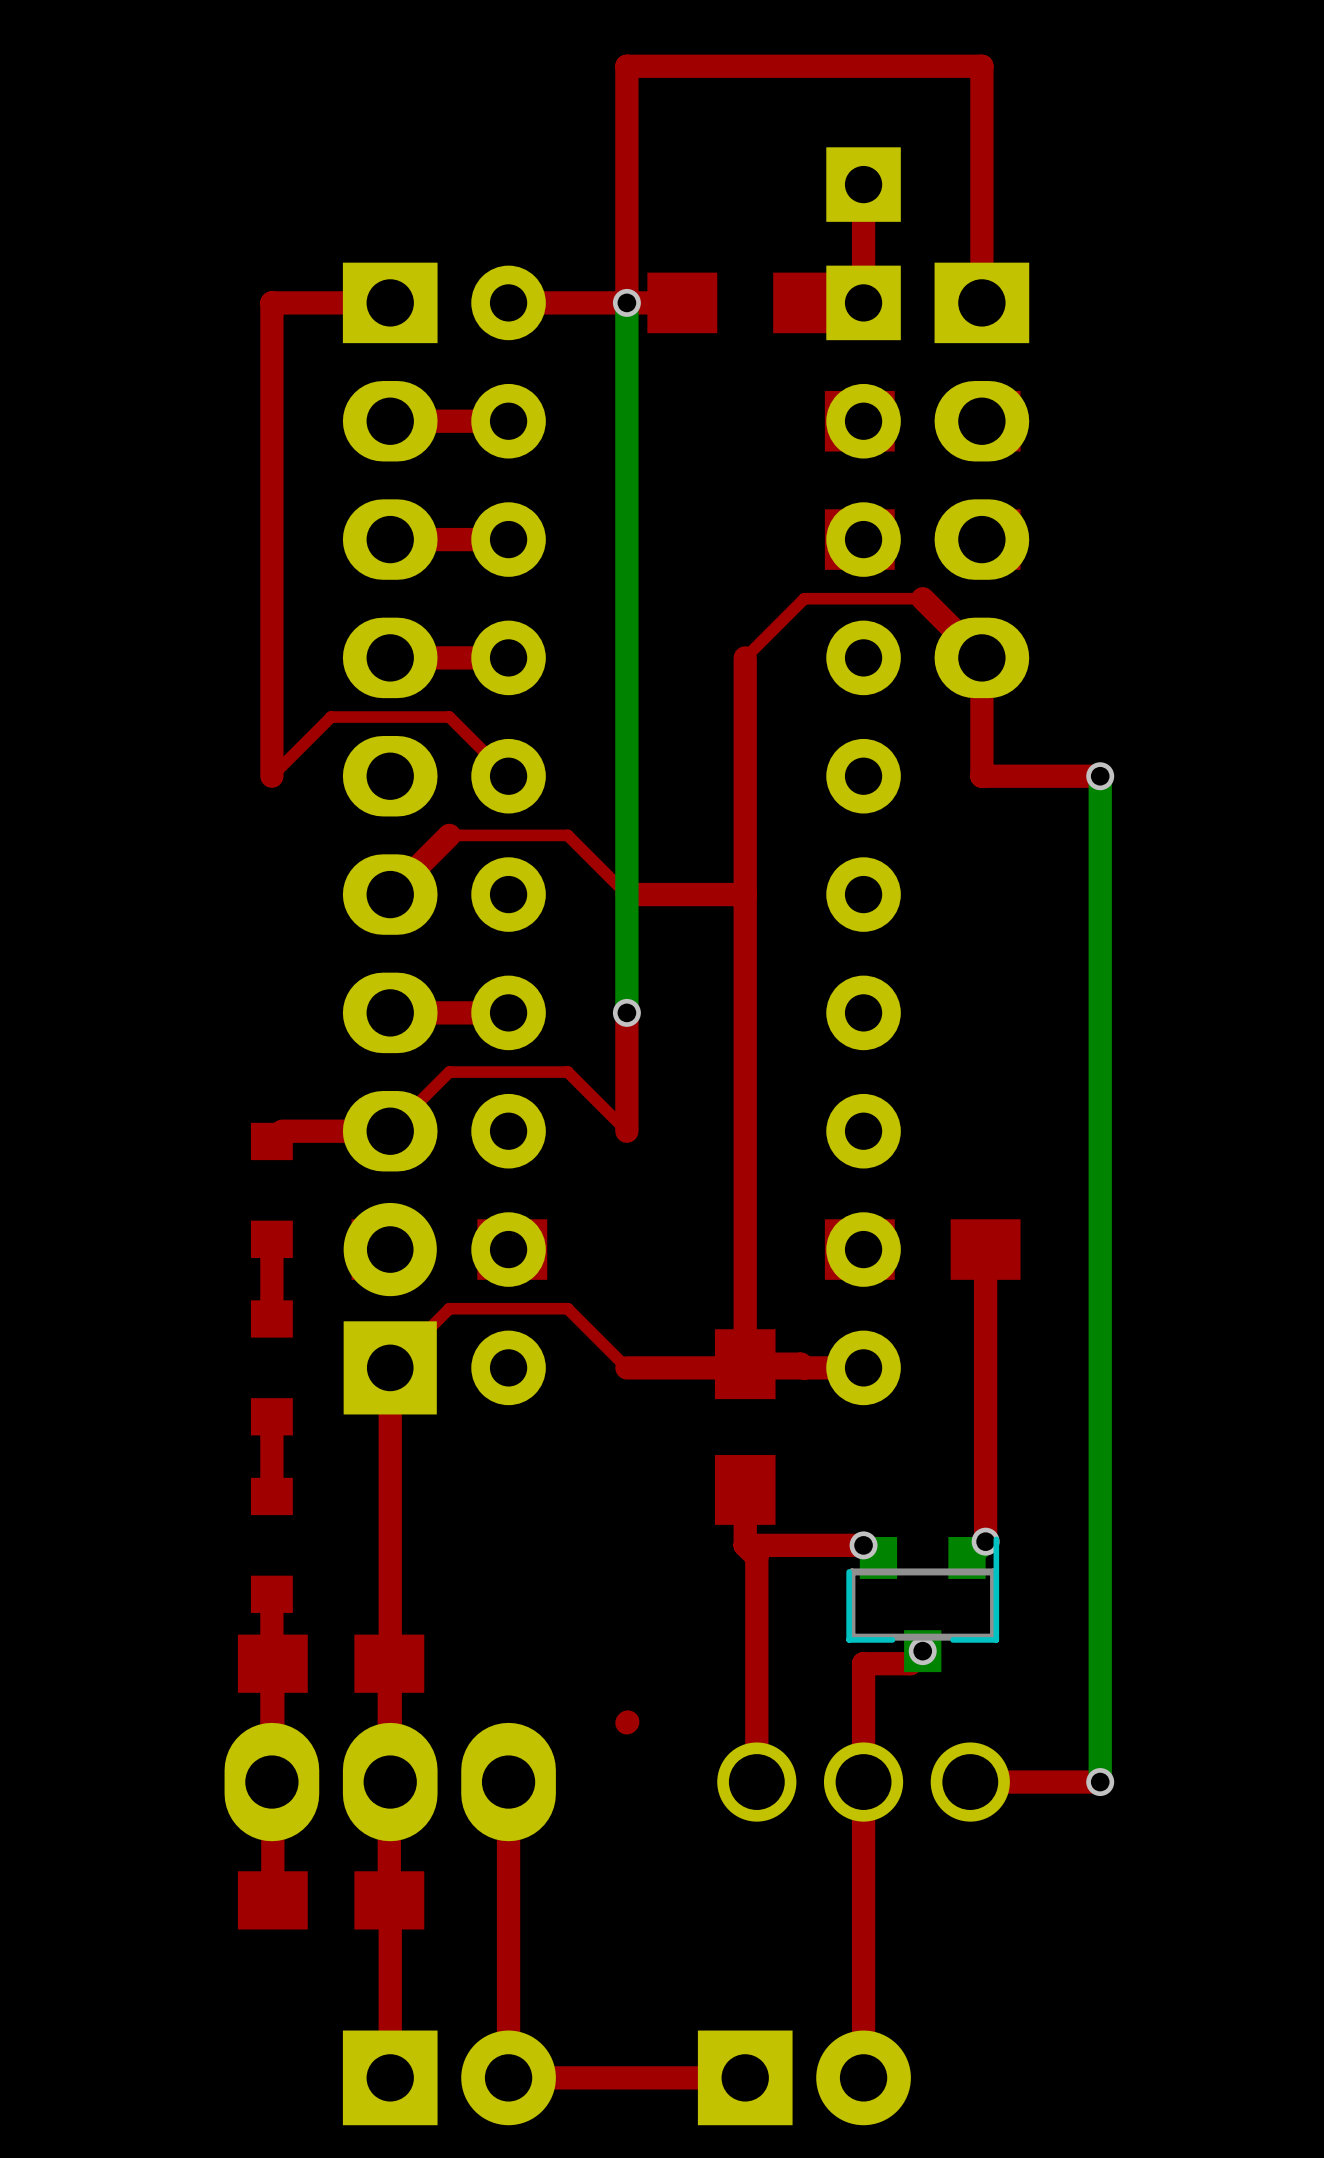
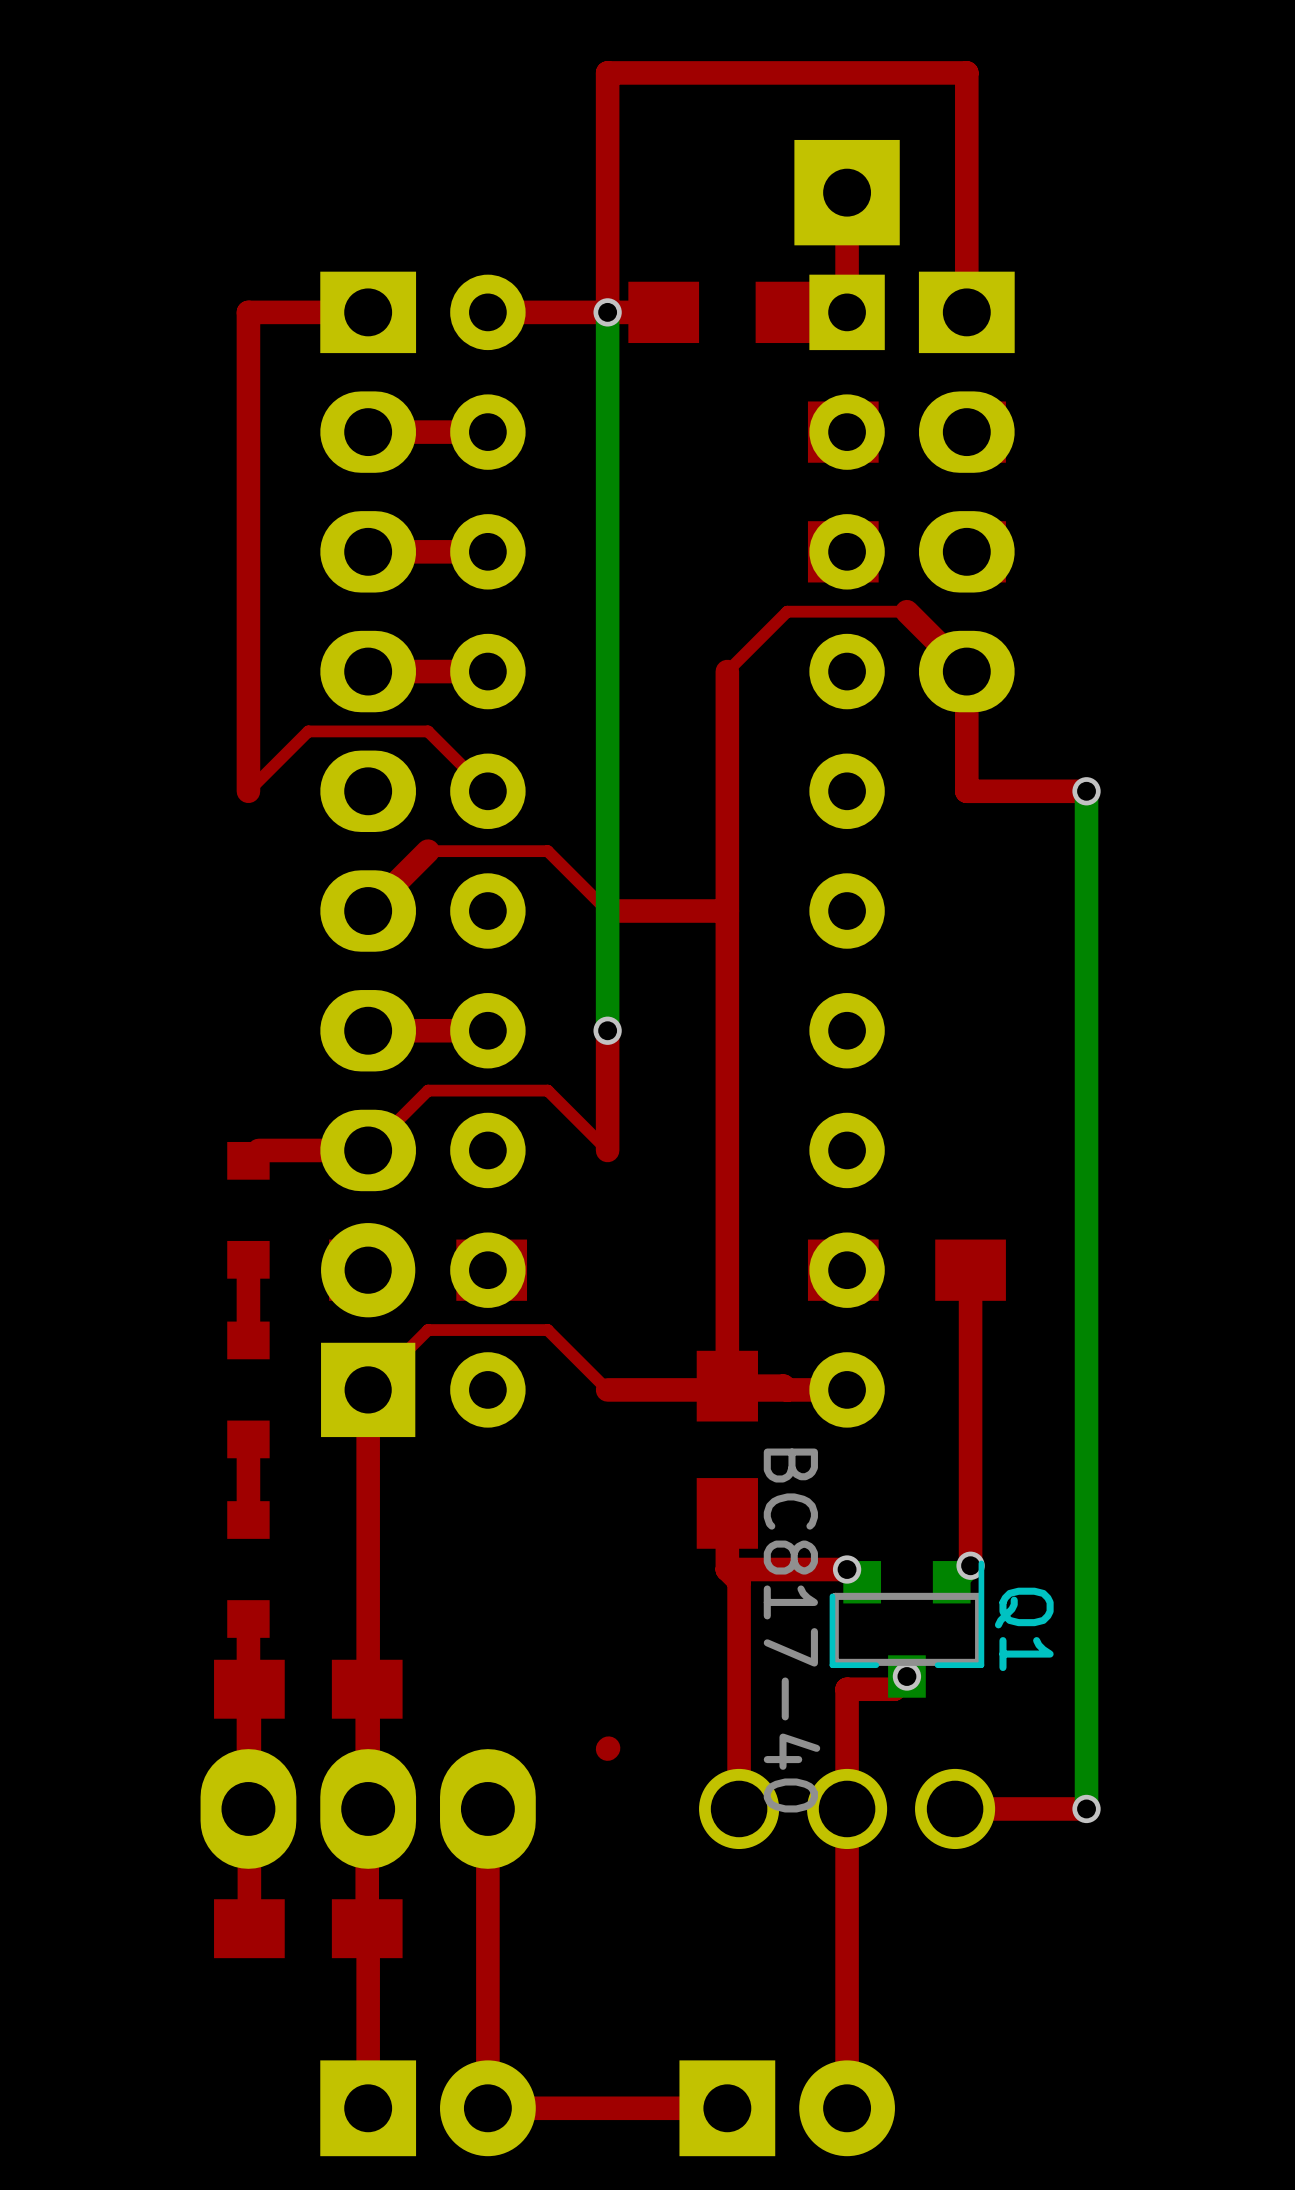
part footprint: [826, 147, 901, 222] -> [794, 139, 900, 246]
Q1 name: none -> Q1 (1024, 1629)
Q1 value: none -> BC817-40 (791, 1630)

